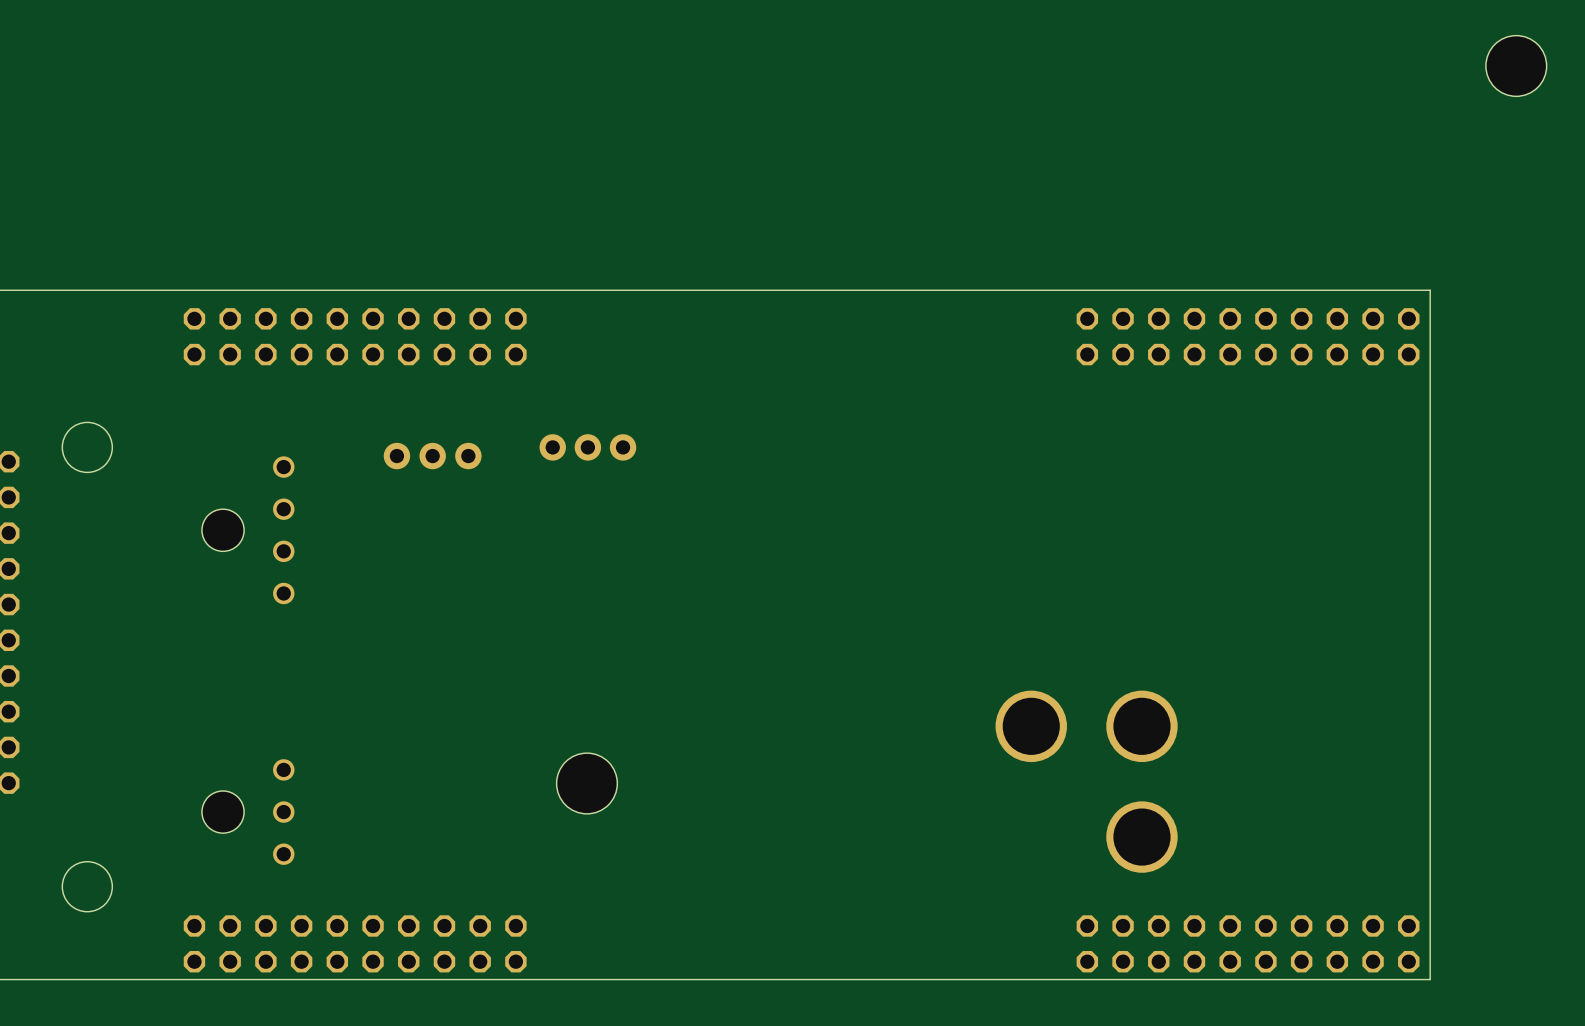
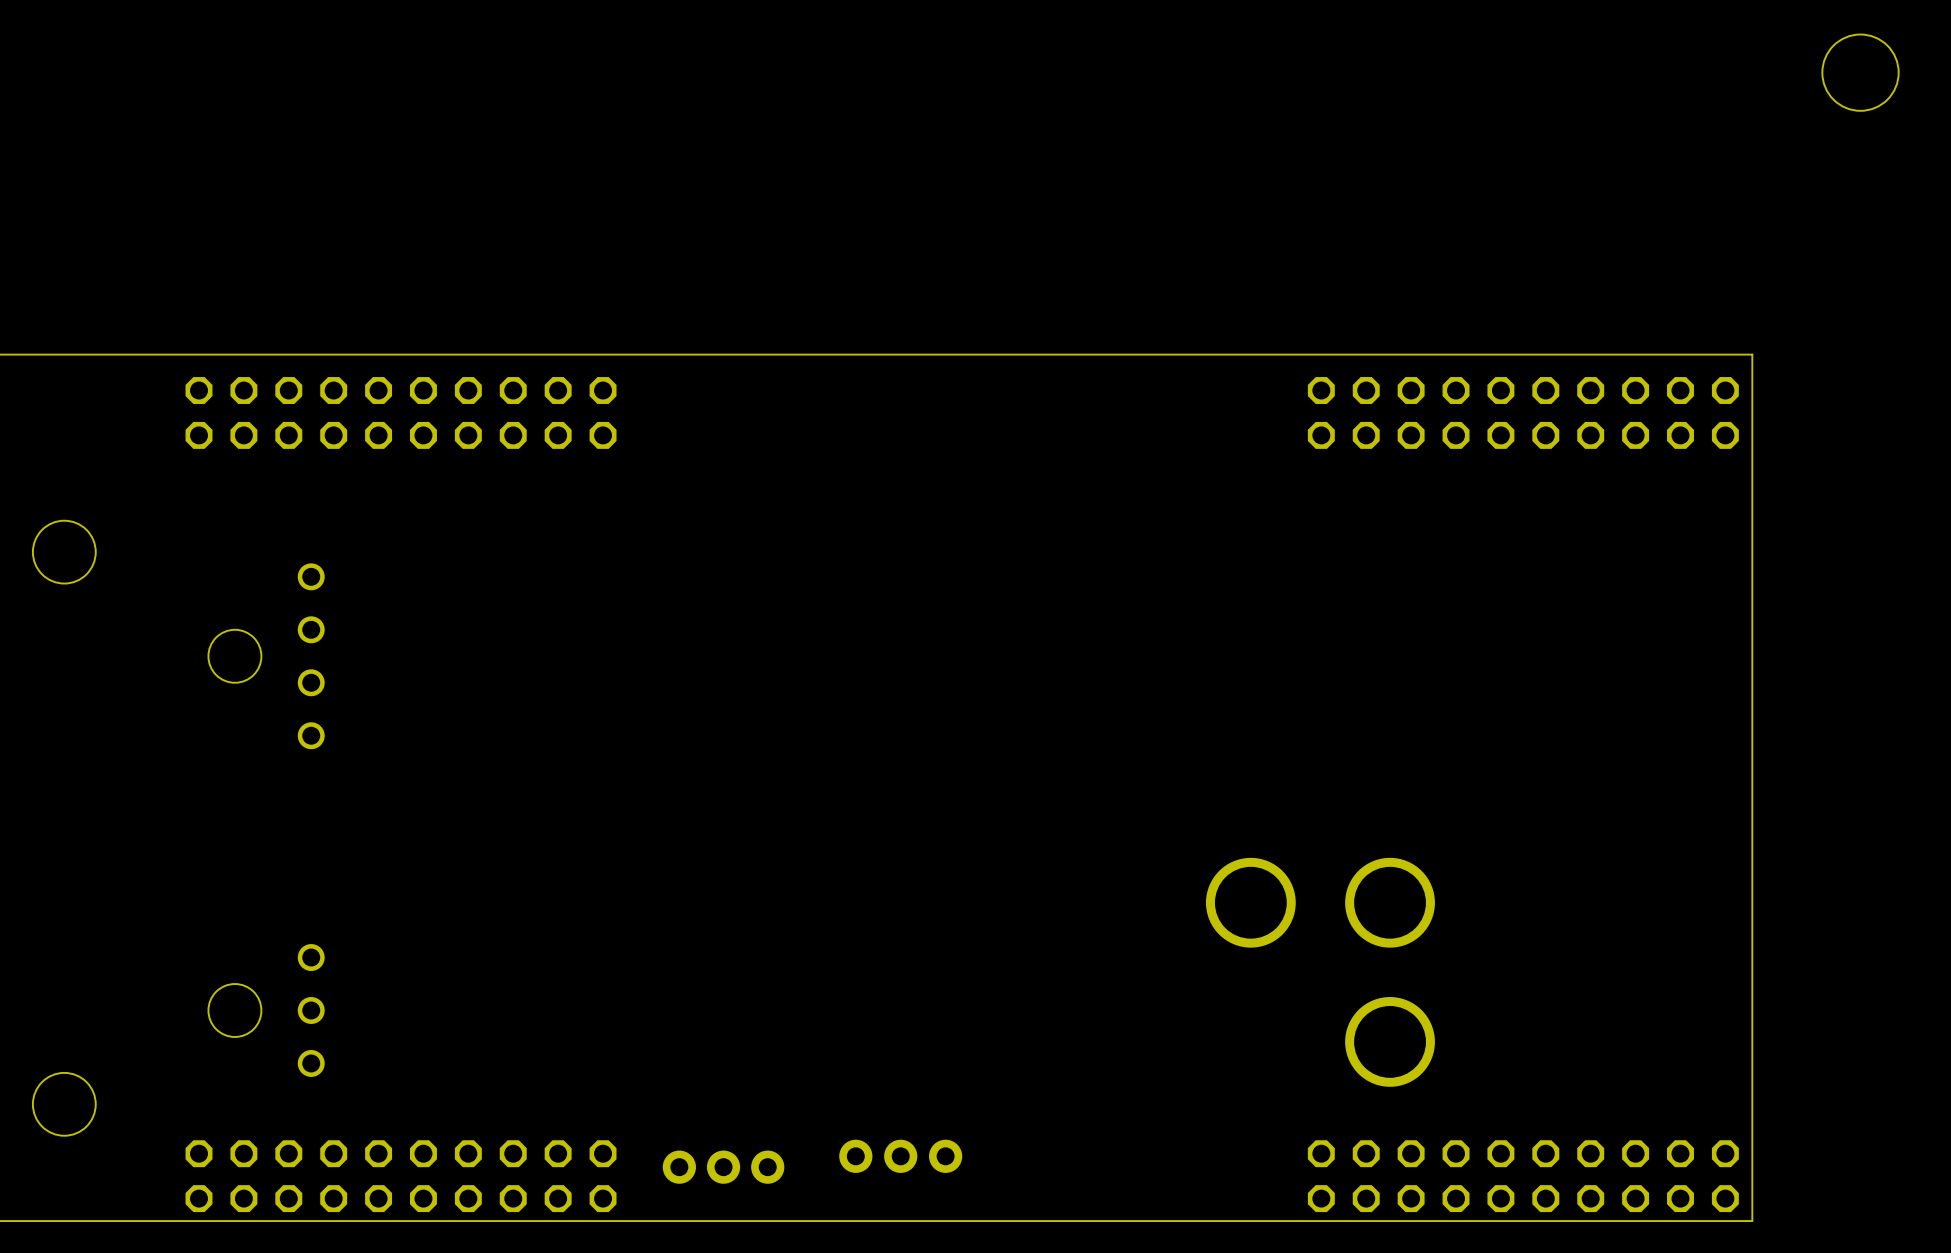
part: (587, 447) -> none
part: (432, 456) -> none
part: (586, 783) -> none
part: none -> (900, 1156)
part: none -> (723, 1167)

